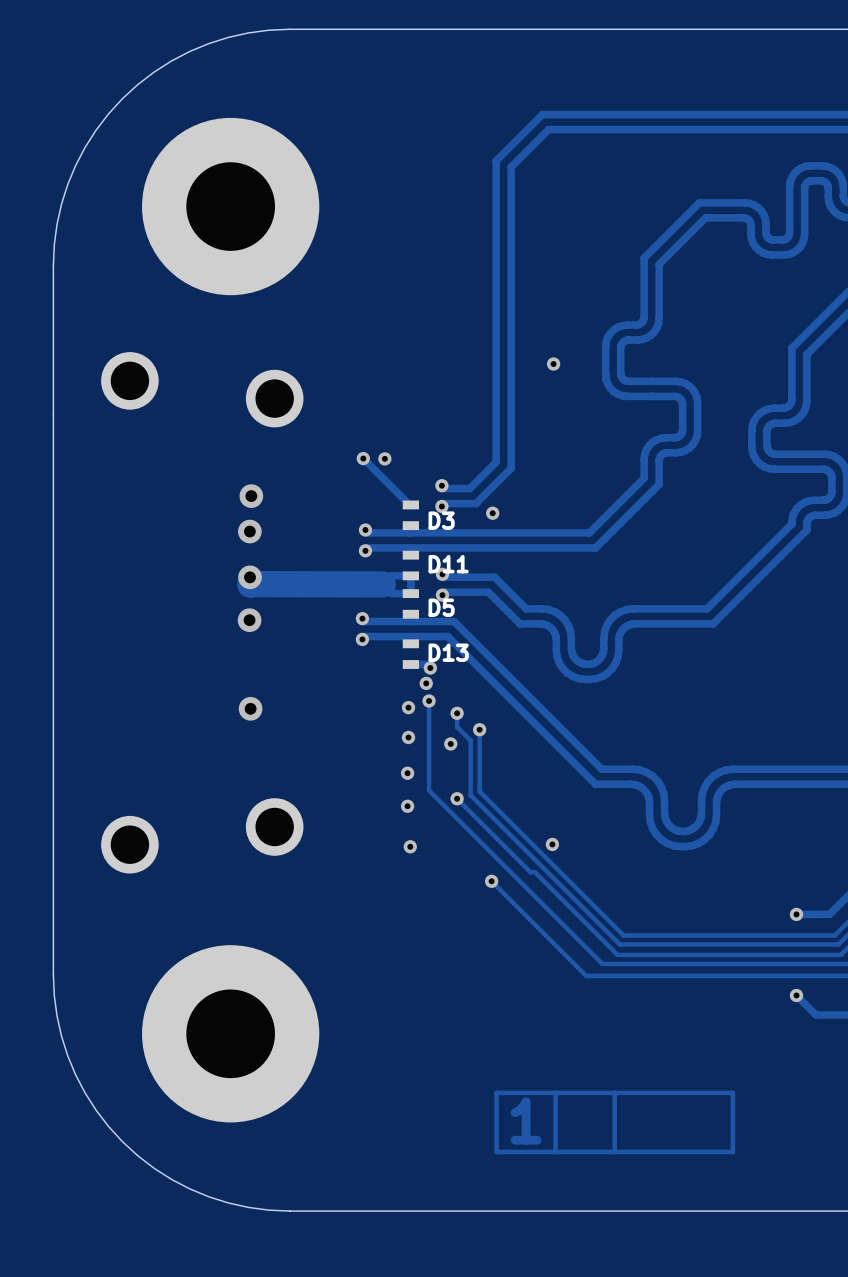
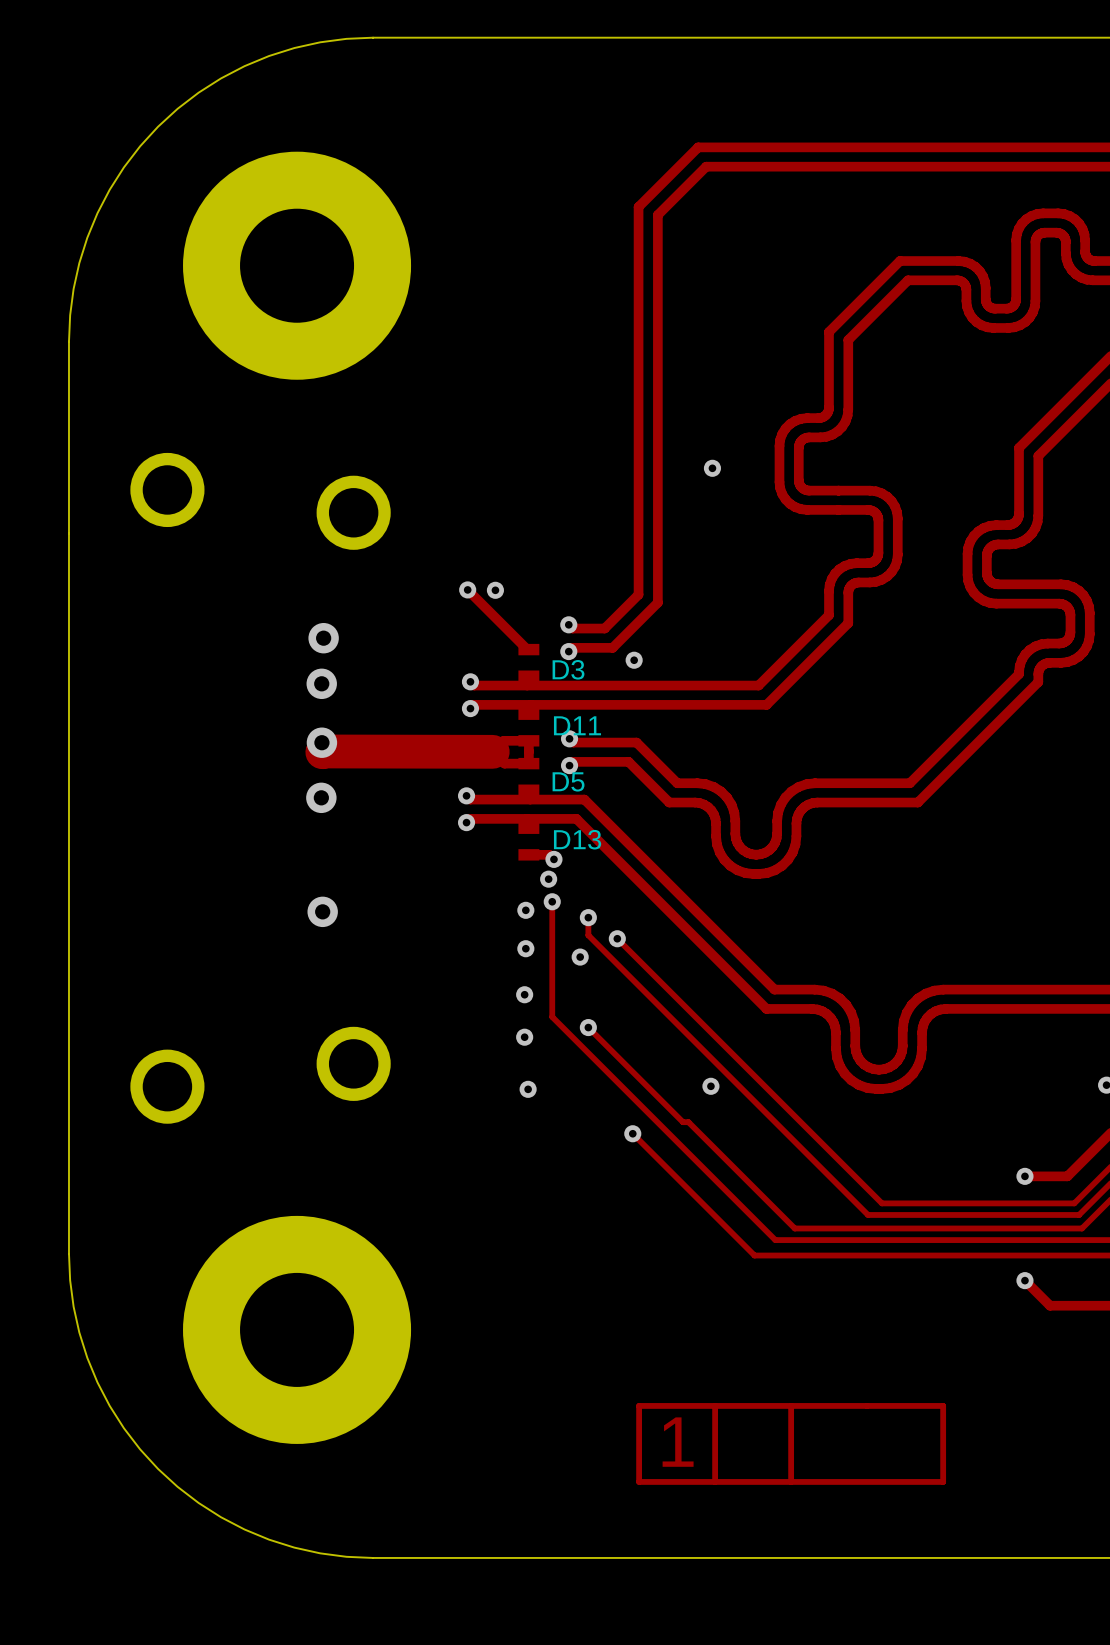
track: (479, 729) (479, 791) (623, 935) (685, 935) -> (617, 938) (881, 1203)
track: (470, 740) (470, 795) -> none
track: (471, 795) (619, 944) (674, 944) -> (605, 952) (868, 1214)

